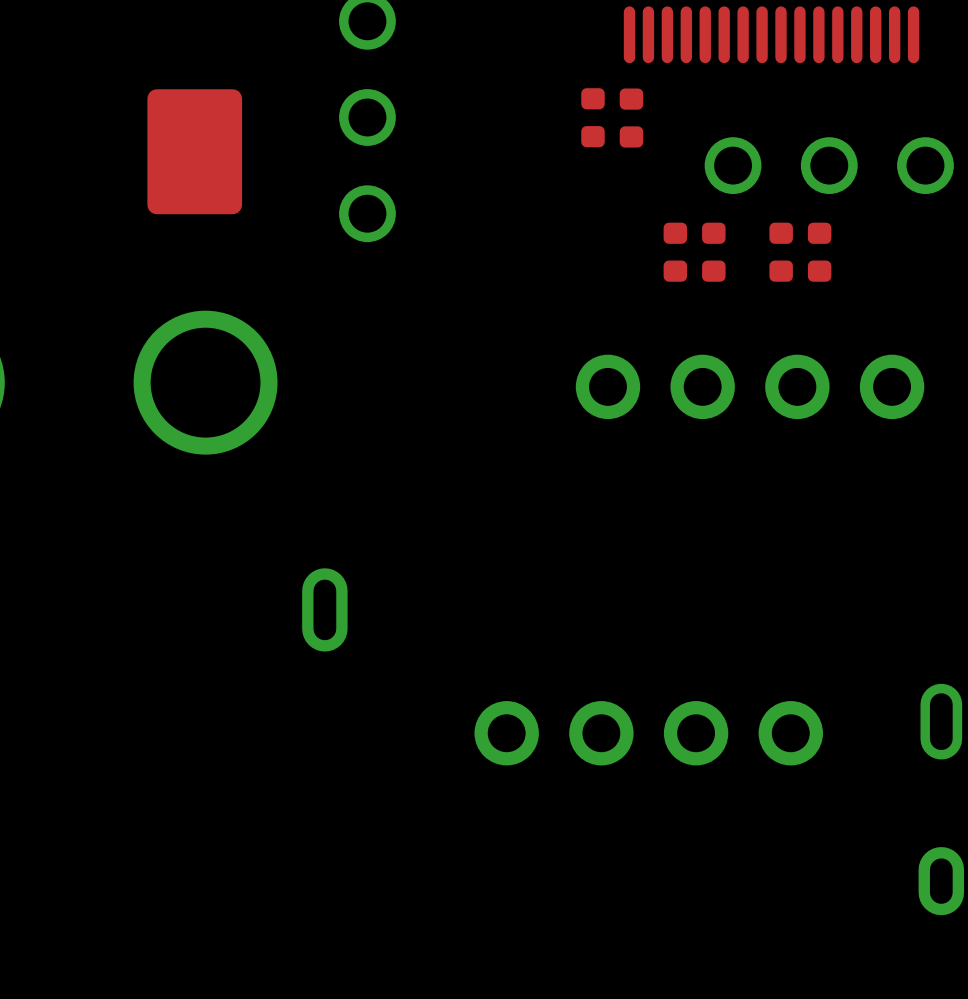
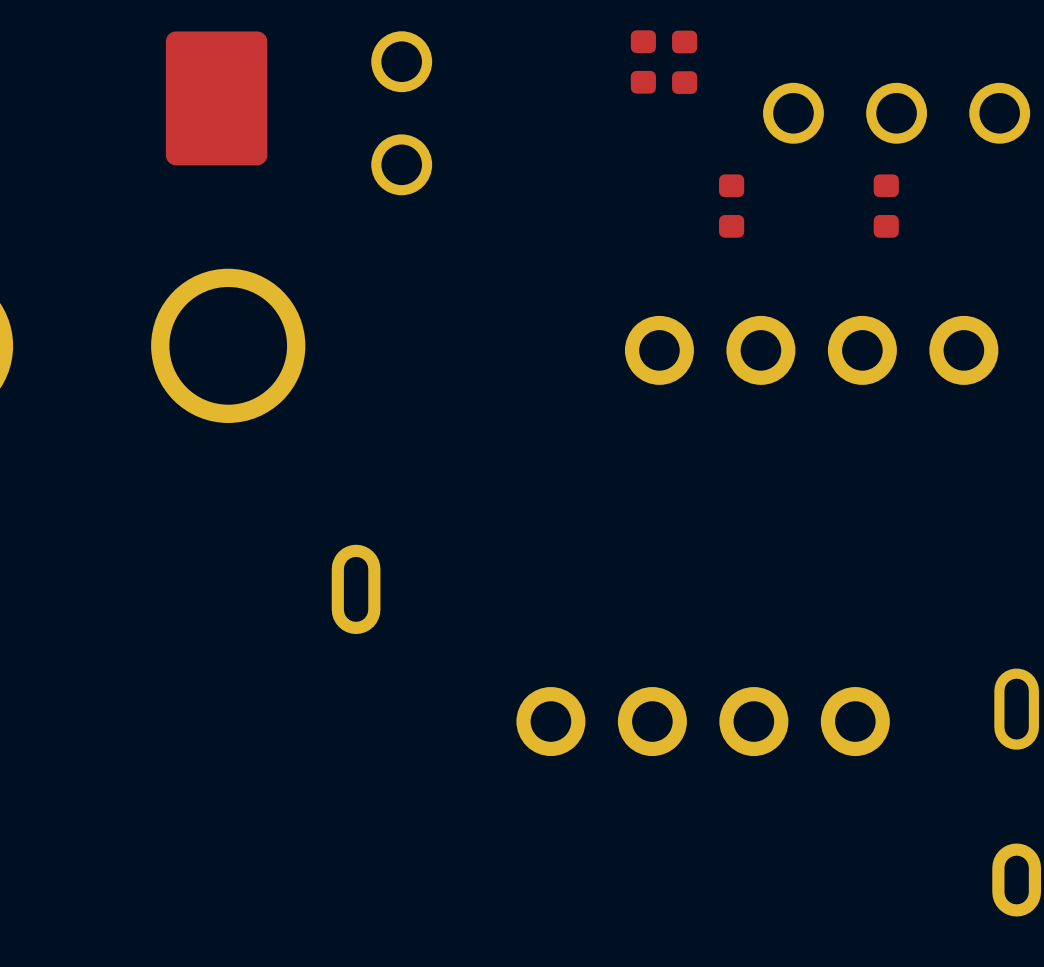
part: (713, 252) -> none
part: (781, 252) -> none

